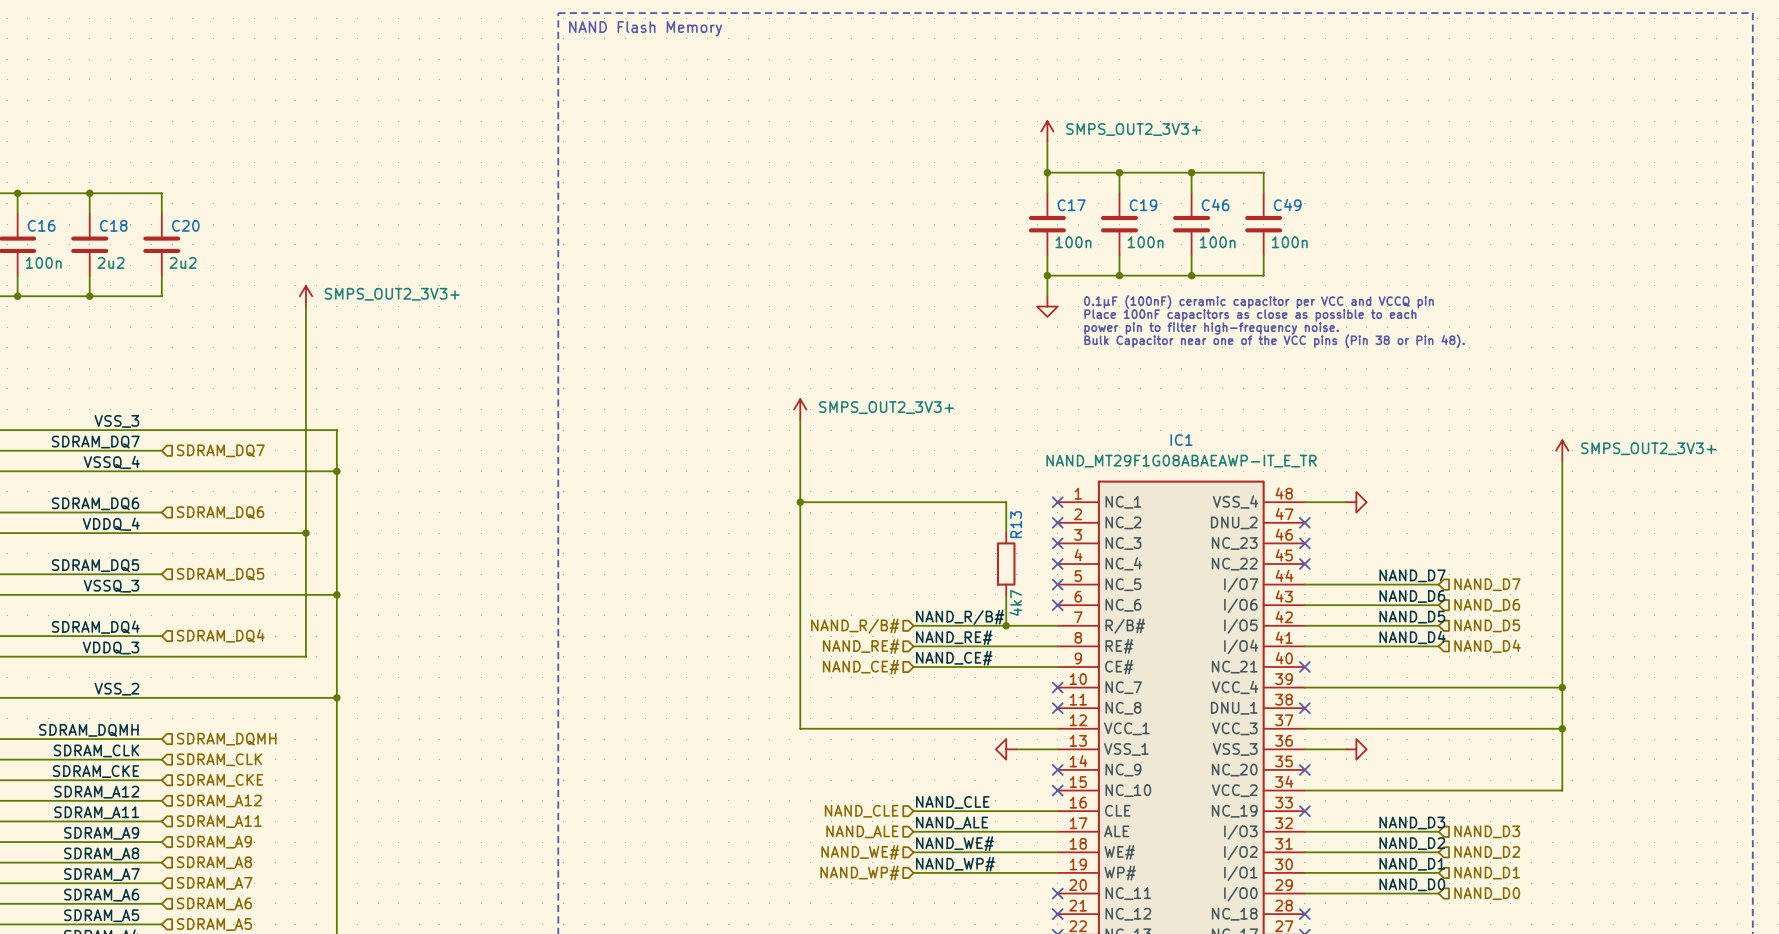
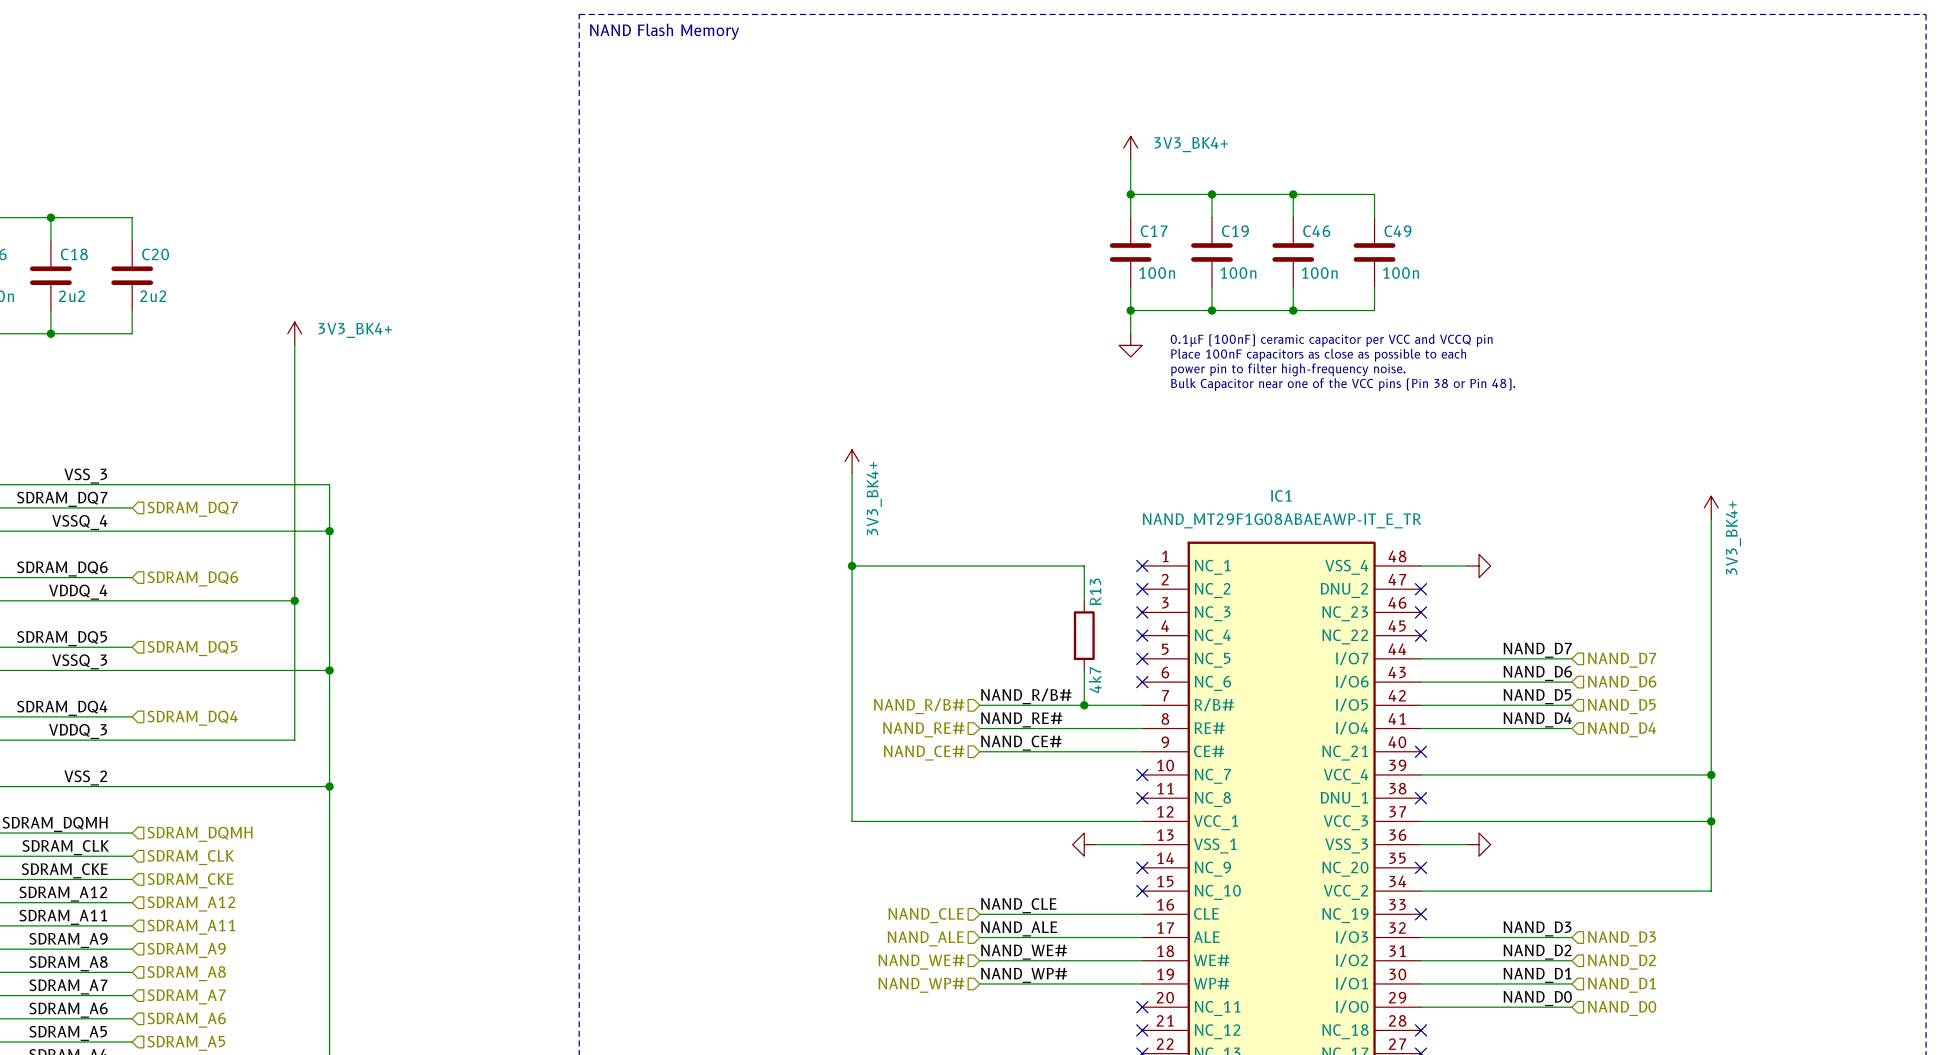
power symbol: SMPS_OUT2_3V3+ (1047, 131) -> 3V3_BK4+ (1130, 147)
power symbol: SMPS_OUT2_3V3+ (305, 296) -> 3V3_BK4+ (294, 333)
power symbol: SMPS_OUT2_3V3+ (800, 409) -> 3V3_BK4+ (852, 461)
power symbol: SMPS_OUT2_3V3+ (1562, 450) -> 3V3_BK4+ (1711, 507)

